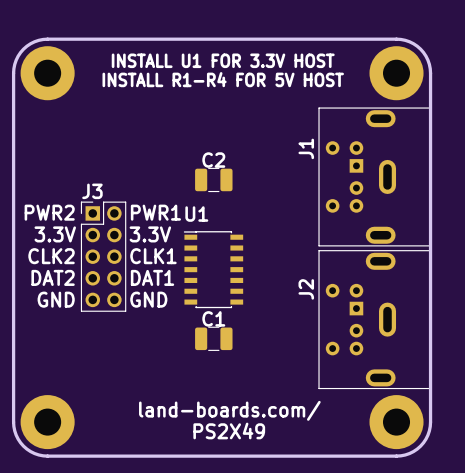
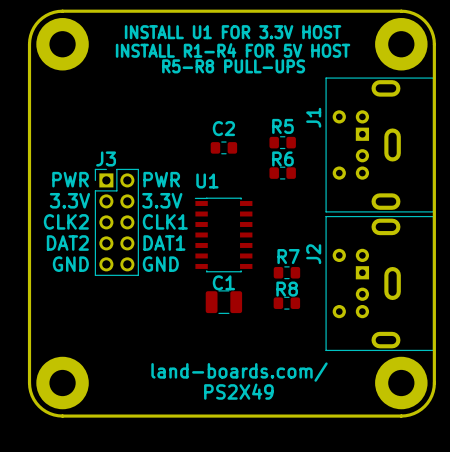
text: none -> R5-R8 PULL-UPS (233, 66)
C2 footprint: [195, 167, 233, 193] -> [210, 141, 238, 155]
R5: none -> (282, 142)
R6: none -> (282, 173)
text: PWR2 (49, 212) -> PWR (70, 179)
text: PWR1 (155, 212) -> PWR (161, 179)
R7: none -> (286, 272)
R8: none -> (286, 303)

